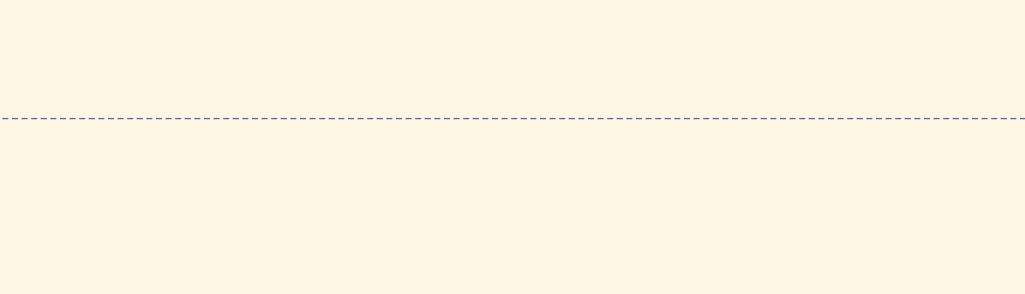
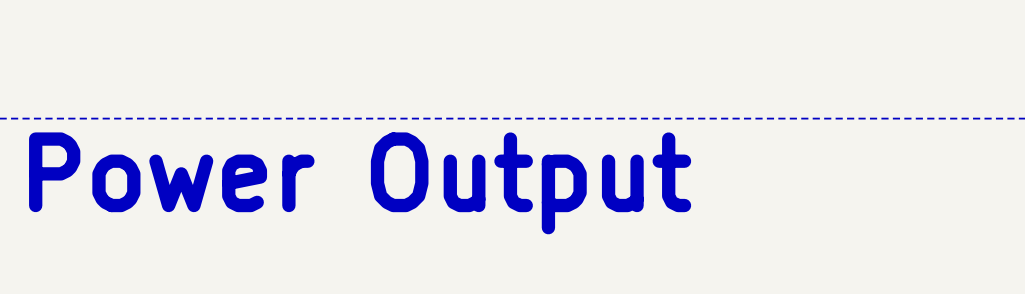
text: none -> Power Output (360, 183)

